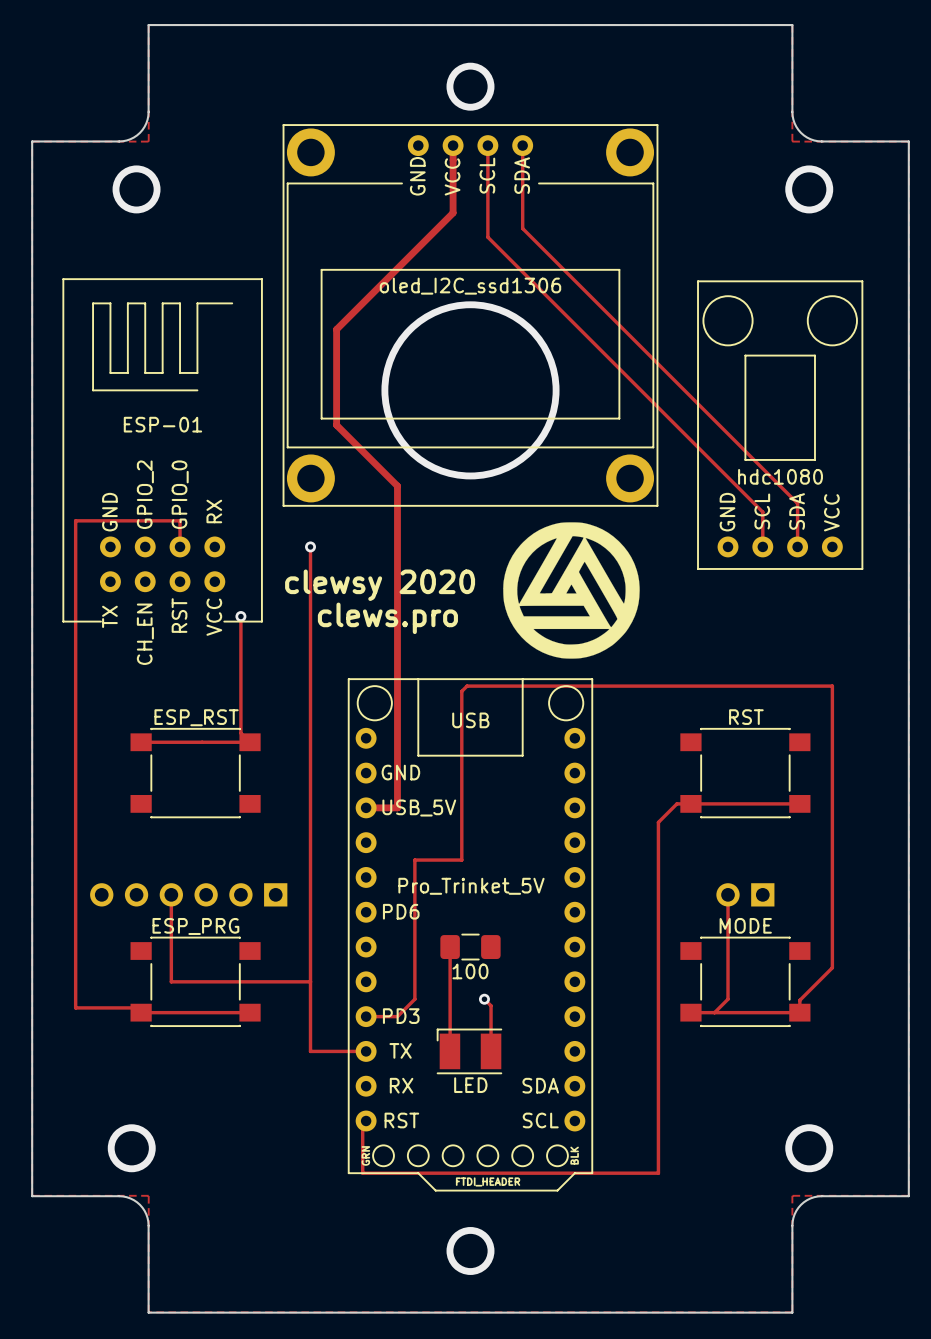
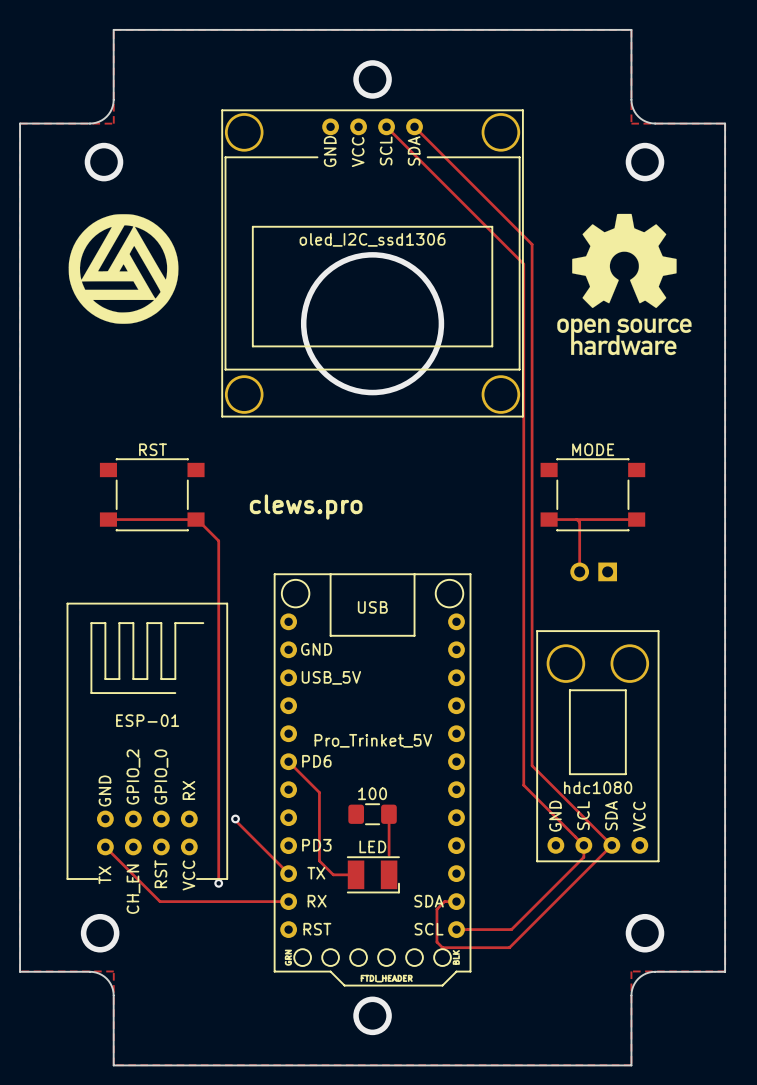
part footprint: [282, 124, 659, 507] -> [221, 109, 524, 418]
track: (453, 145) (453, 212) (336, 329) (336, 425) (397, 486) (397, 807) (366, 807) -> none
track: (487, 145) (487, 237) (762, 512) (762, 546) -> (386, 126) (523, 264) (523, 785) (583, 845) (583, 857) (511, 929) (456, 929)
track: (522, 145) (522, 228) (797, 503) (797, 546) -> (414, 126) (532, 244) (532, 765) (537, 771)
drawing: none -> [557, 213, 692, 356]
drawing: none -> [68, 214, 179, 324]
part: hdc1080 (780, 425) -> none
part: ESP-01 (162, 450) -> none
drawing: [503, 522, 640, 659] -> none
track: (180, 546) (180, 520) (75, 520) (75, 1007) (134, 1007) (139, 1012) (250, 1012) -> none
track: (310, 546) (310, 1051) (366, 1051) -> none
via: (310, 546) -> none
text: clewsy 2020 (380, 585) -> none
RST: none -> (152, 494)
MODE: none -> (592, 494)
track: (240, 616) (240, 733) (250, 742) (141, 742) -> none
via: (240, 616) -> none
track: none -> (108, 519) (197, 519) (218, 540) (218, 883)
track: none -> (549, 519) (636, 519)
track: none -> (576, 519) (579, 522) (579, 571)
ESP_RST: (195, 773) -> none
RST: (745, 773) -> none
track: (799, 803) (676, 803) (658, 822) (658, 1173) (362, 1173) (362, 1121) (366, 1121) -> none
track: (171, 894) (171, 981) (310, 981) -> none
part: (188, 894) -> none
track: (728, 894) (728, 999) (714, 1012) -> none
part position: (745, 894) -> (593, 571)
part: none -> ESP-01 (147, 741)
part: none -> hdc1080 (597, 746)
part footprint: [440, 933, 501, 961] -> [273, 573, 472, 987]
track: none -> (288, 761) (319, 792) (319, 860) (333, 874) (356, 874)
part: Pro_Trinket_5V (470, 934) -> none
track: none -> (537, 771) (611, 845) (509, 947) (442, 947) (436, 942) (436, 909) (444, 901) (456, 901)
track: (450, 947) (450, 1051) -> none
part value: 100 (470, 971) -> Pro_Trinket_5V (373, 740)
ESP_PRG: (195, 981) -> none
MODE: (745, 981) -> none
via: (484, 999) -> none
part: none -> 100 (372, 814)
track: none -> (235, 818) (288, 873)
via: none -> (235, 818)
track: (690, 1012) (799, 1012) (799, 1000) (832, 967) (832, 686) (467, 686) (461, 691) (461, 860) (414, 860) (414, 999) (397, 1016) (366, 1016) -> none
track: none -> (105, 846) (160, 901) (288, 901)
part rotation: 0° (469, 1051) -> 180° (373, 874)
via: none -> (218, 883)

